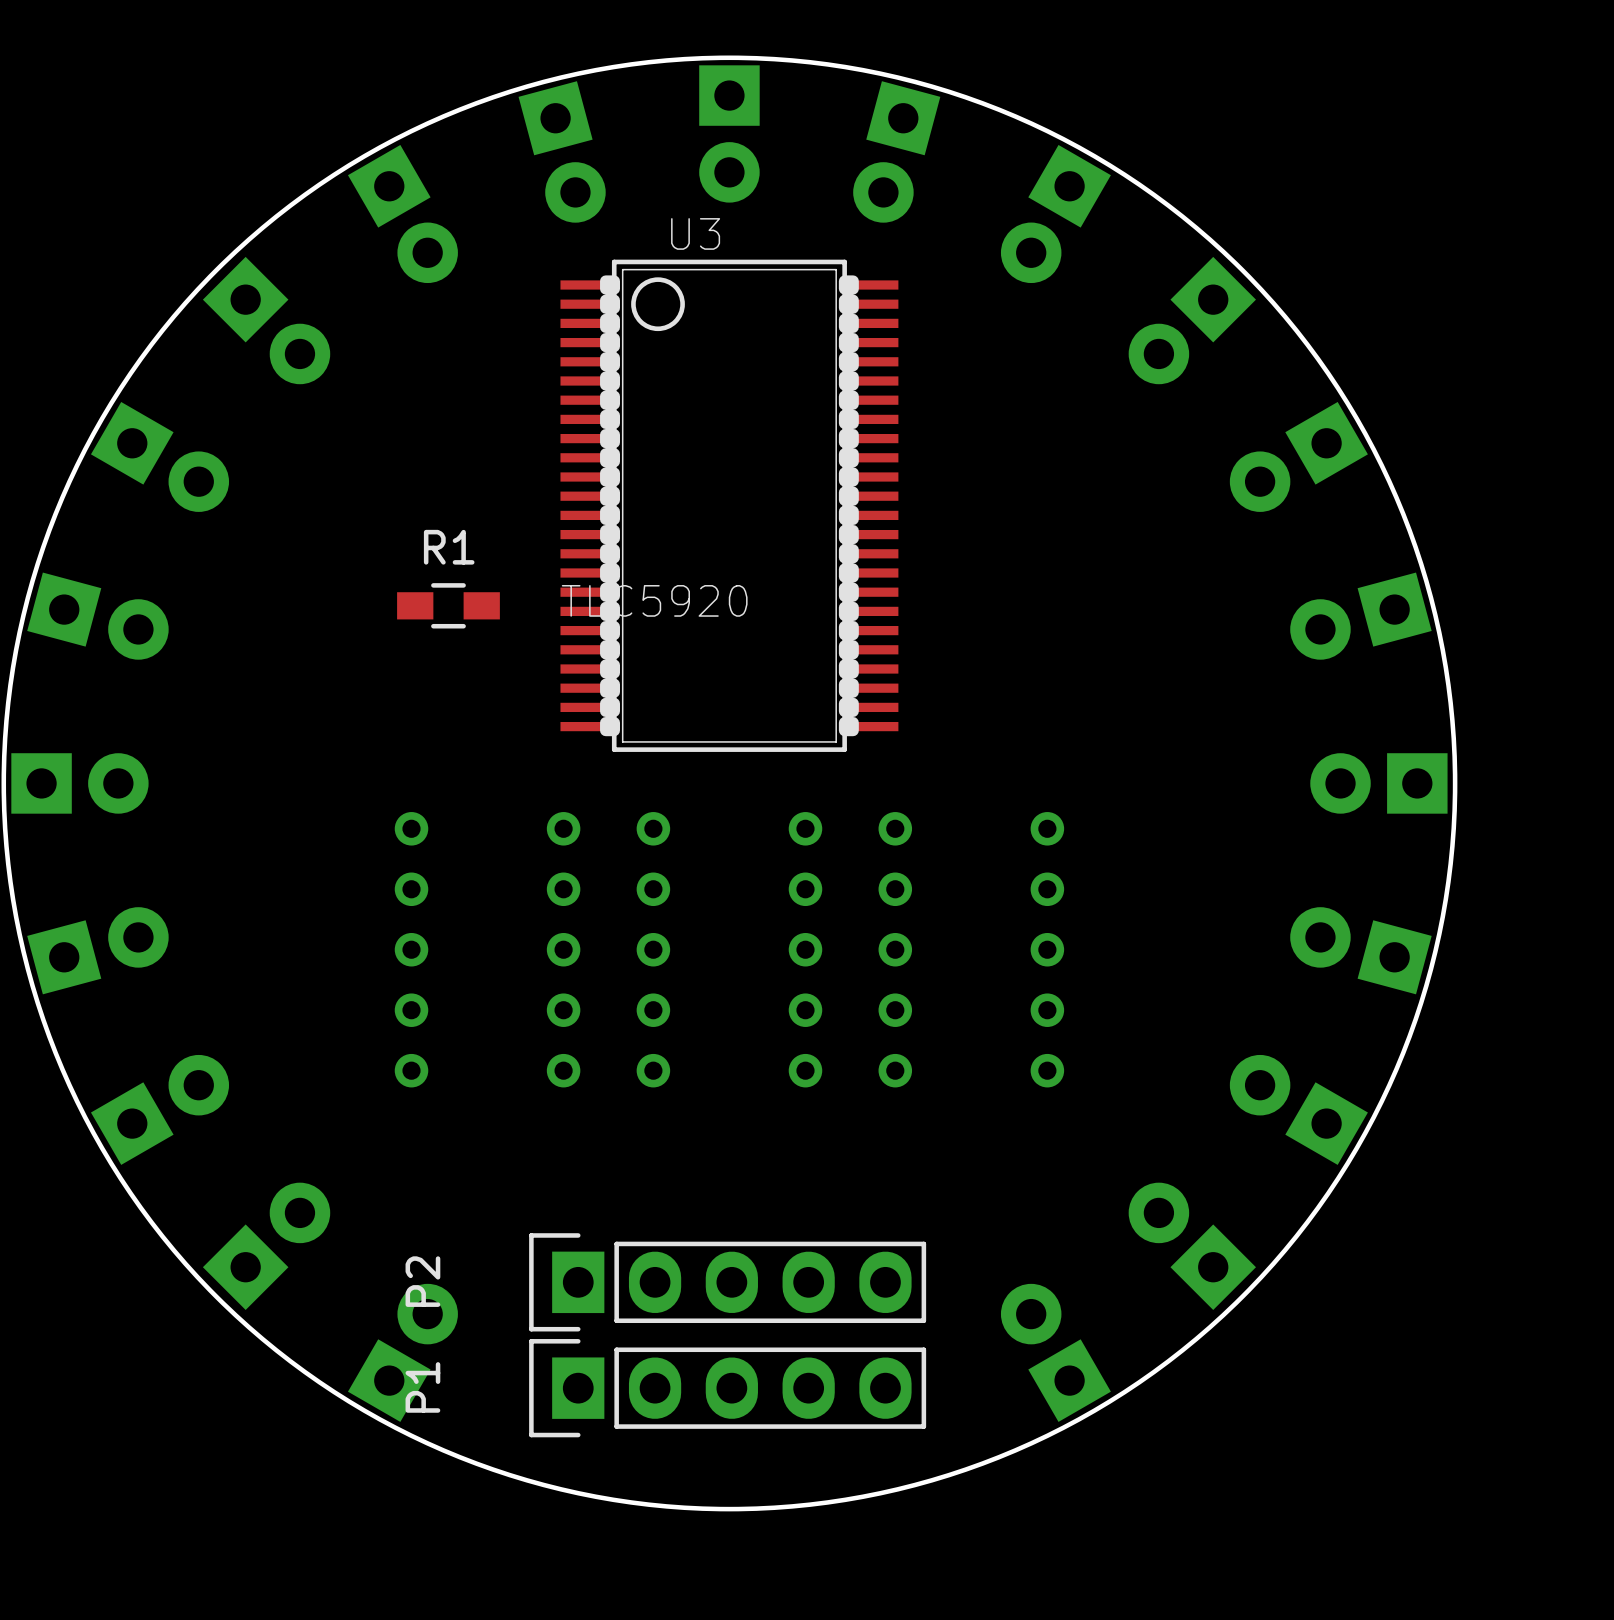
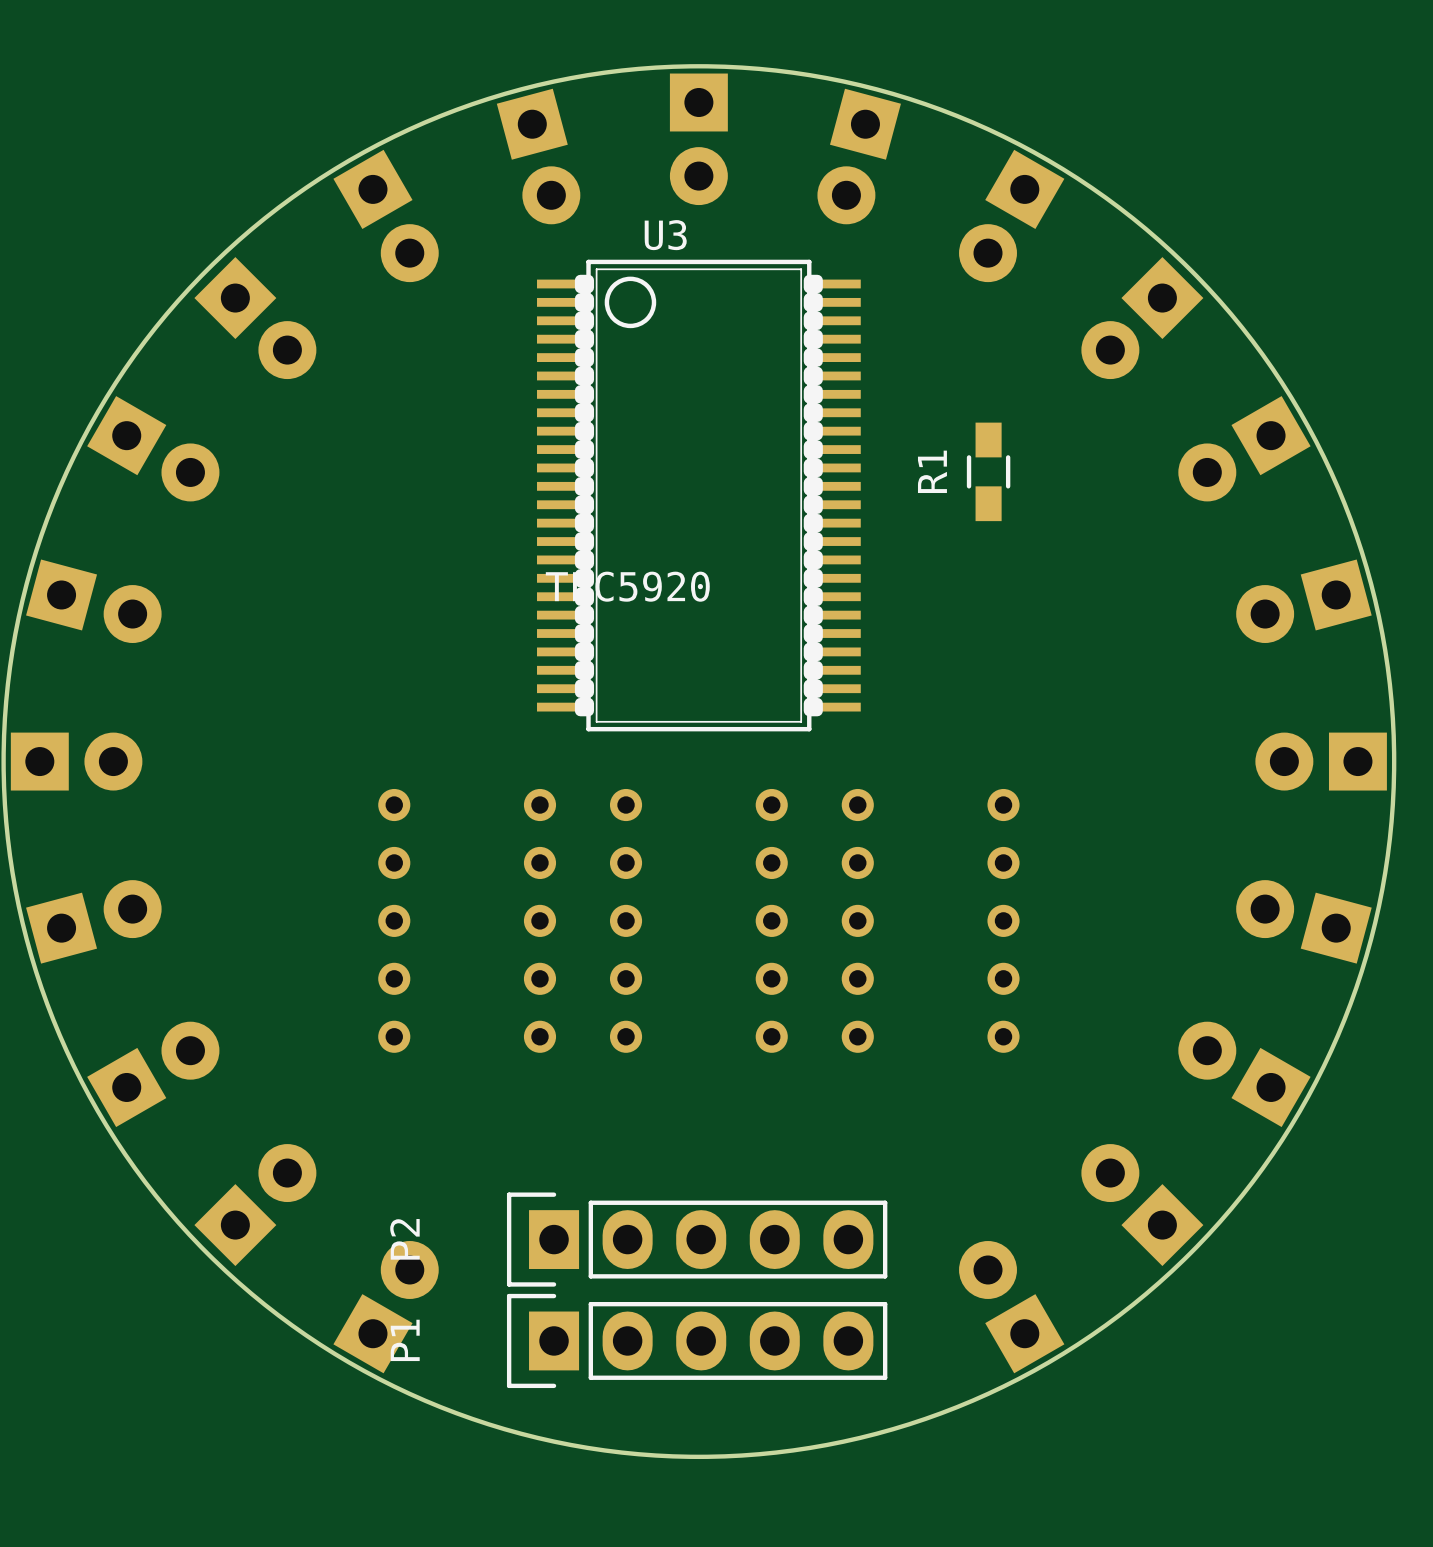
R1 name position: R1 (449, 547) -> R1 (932, 471)
R1 rotation: 0° (448, 605) -> 90° clockwise (988, 471)
R1 position: (448, 605) -> (988, 471)

